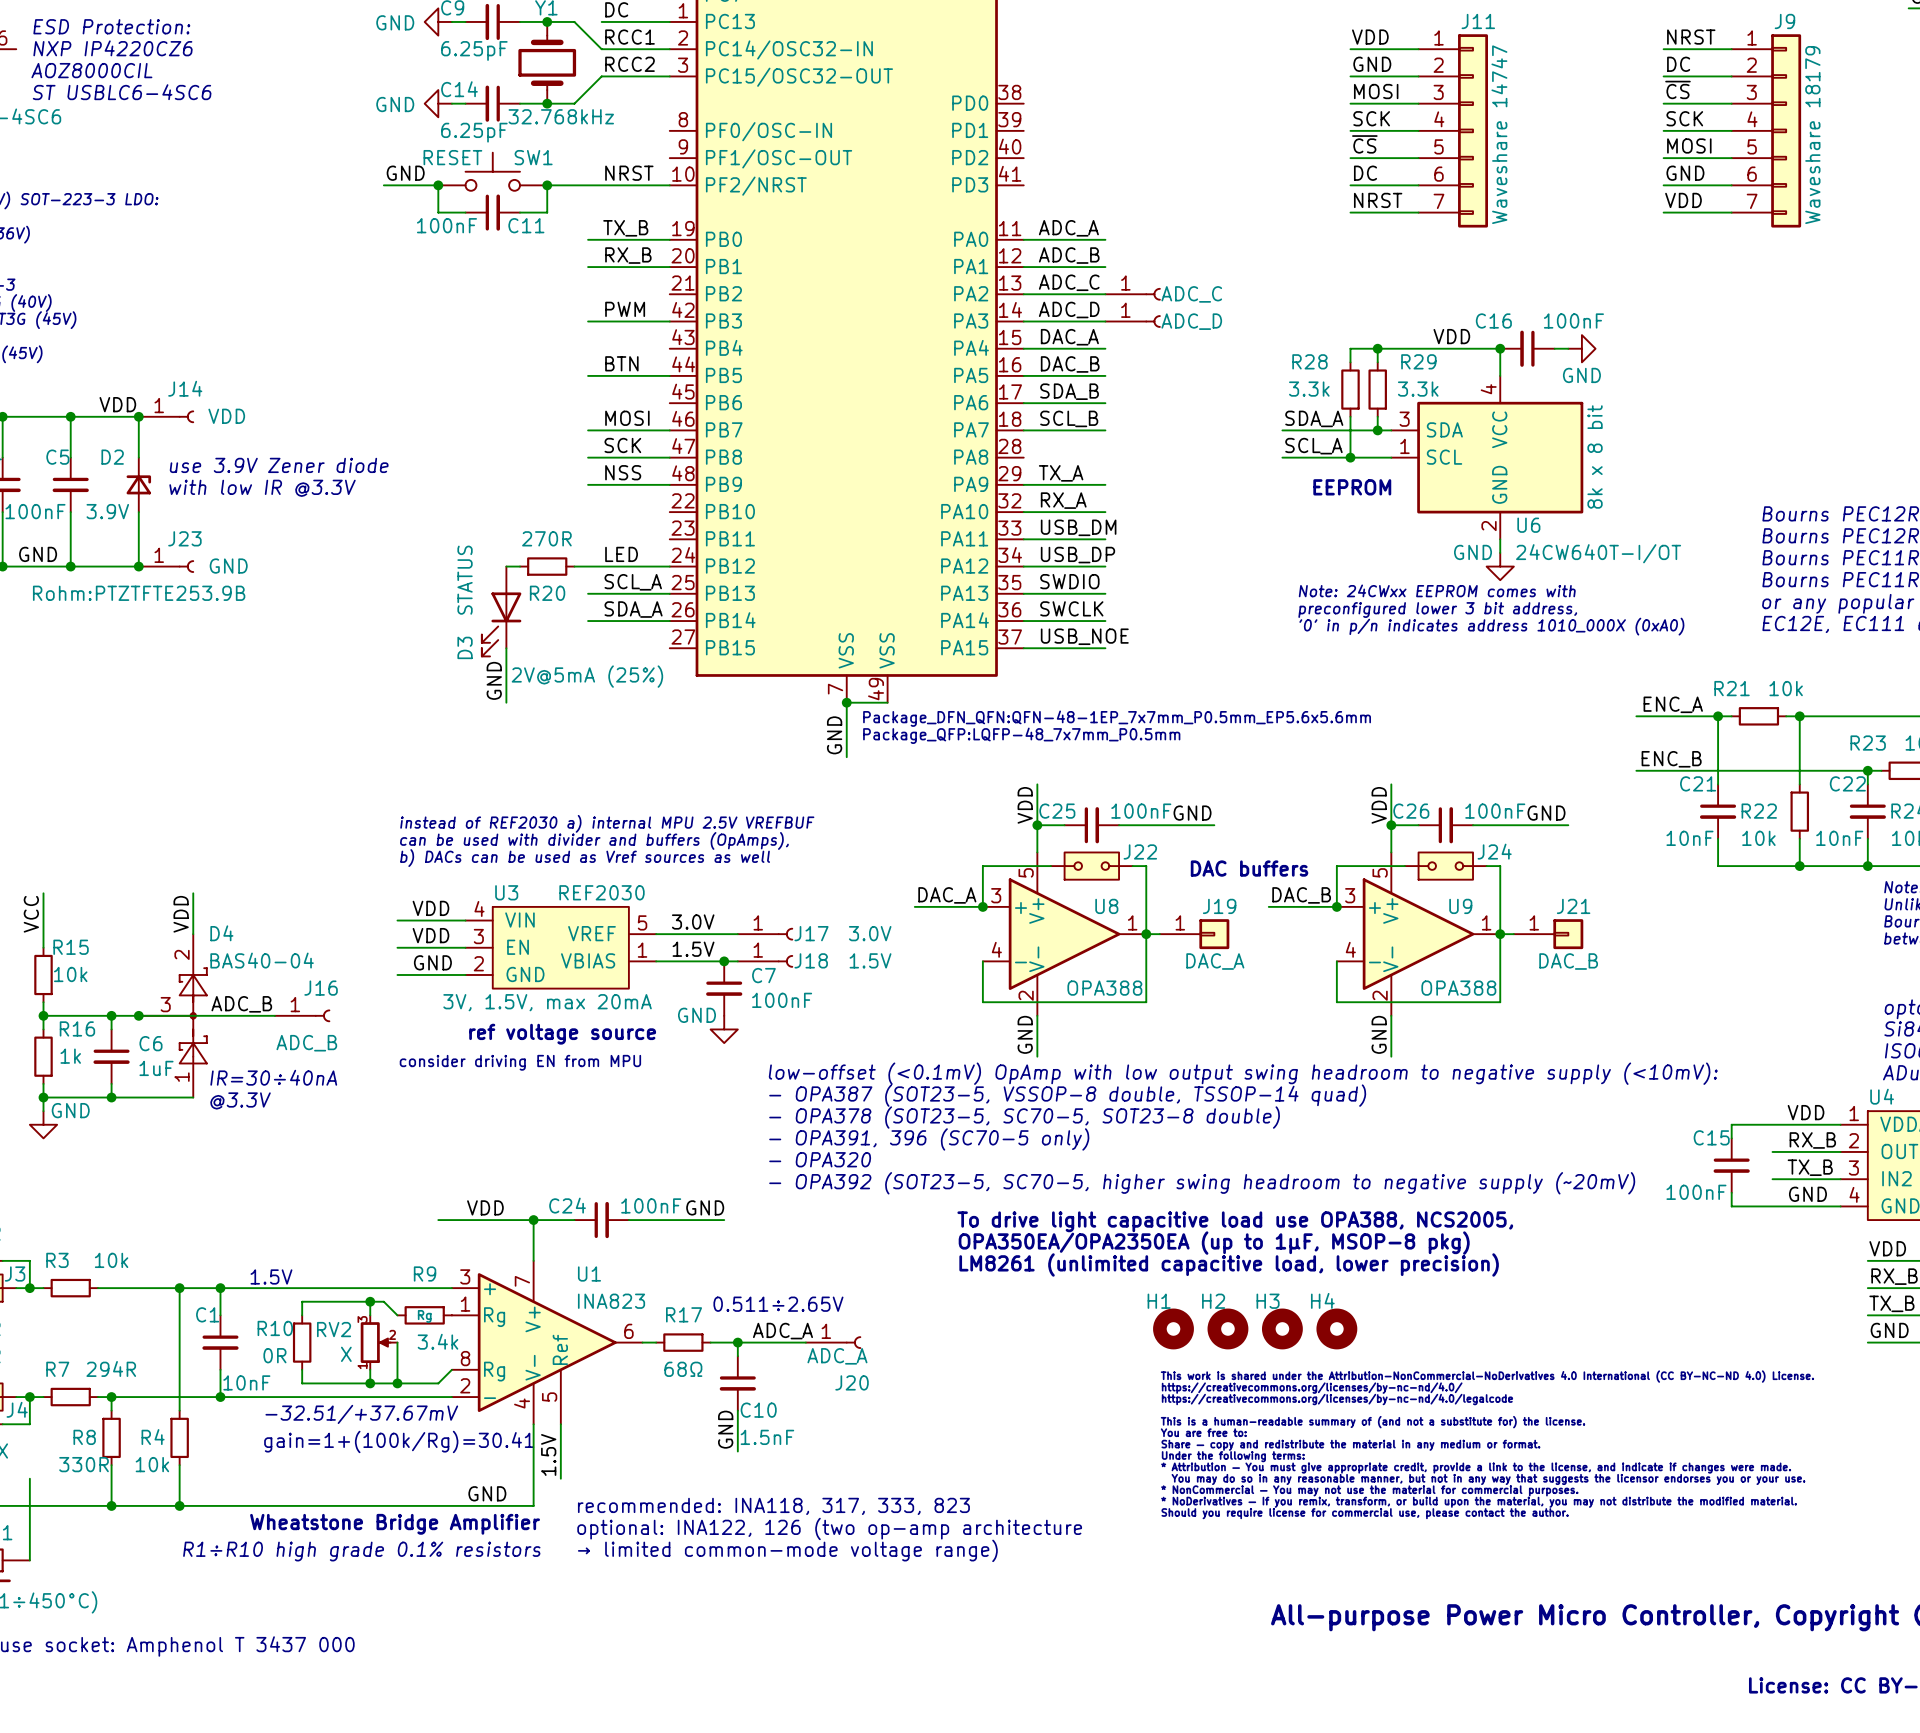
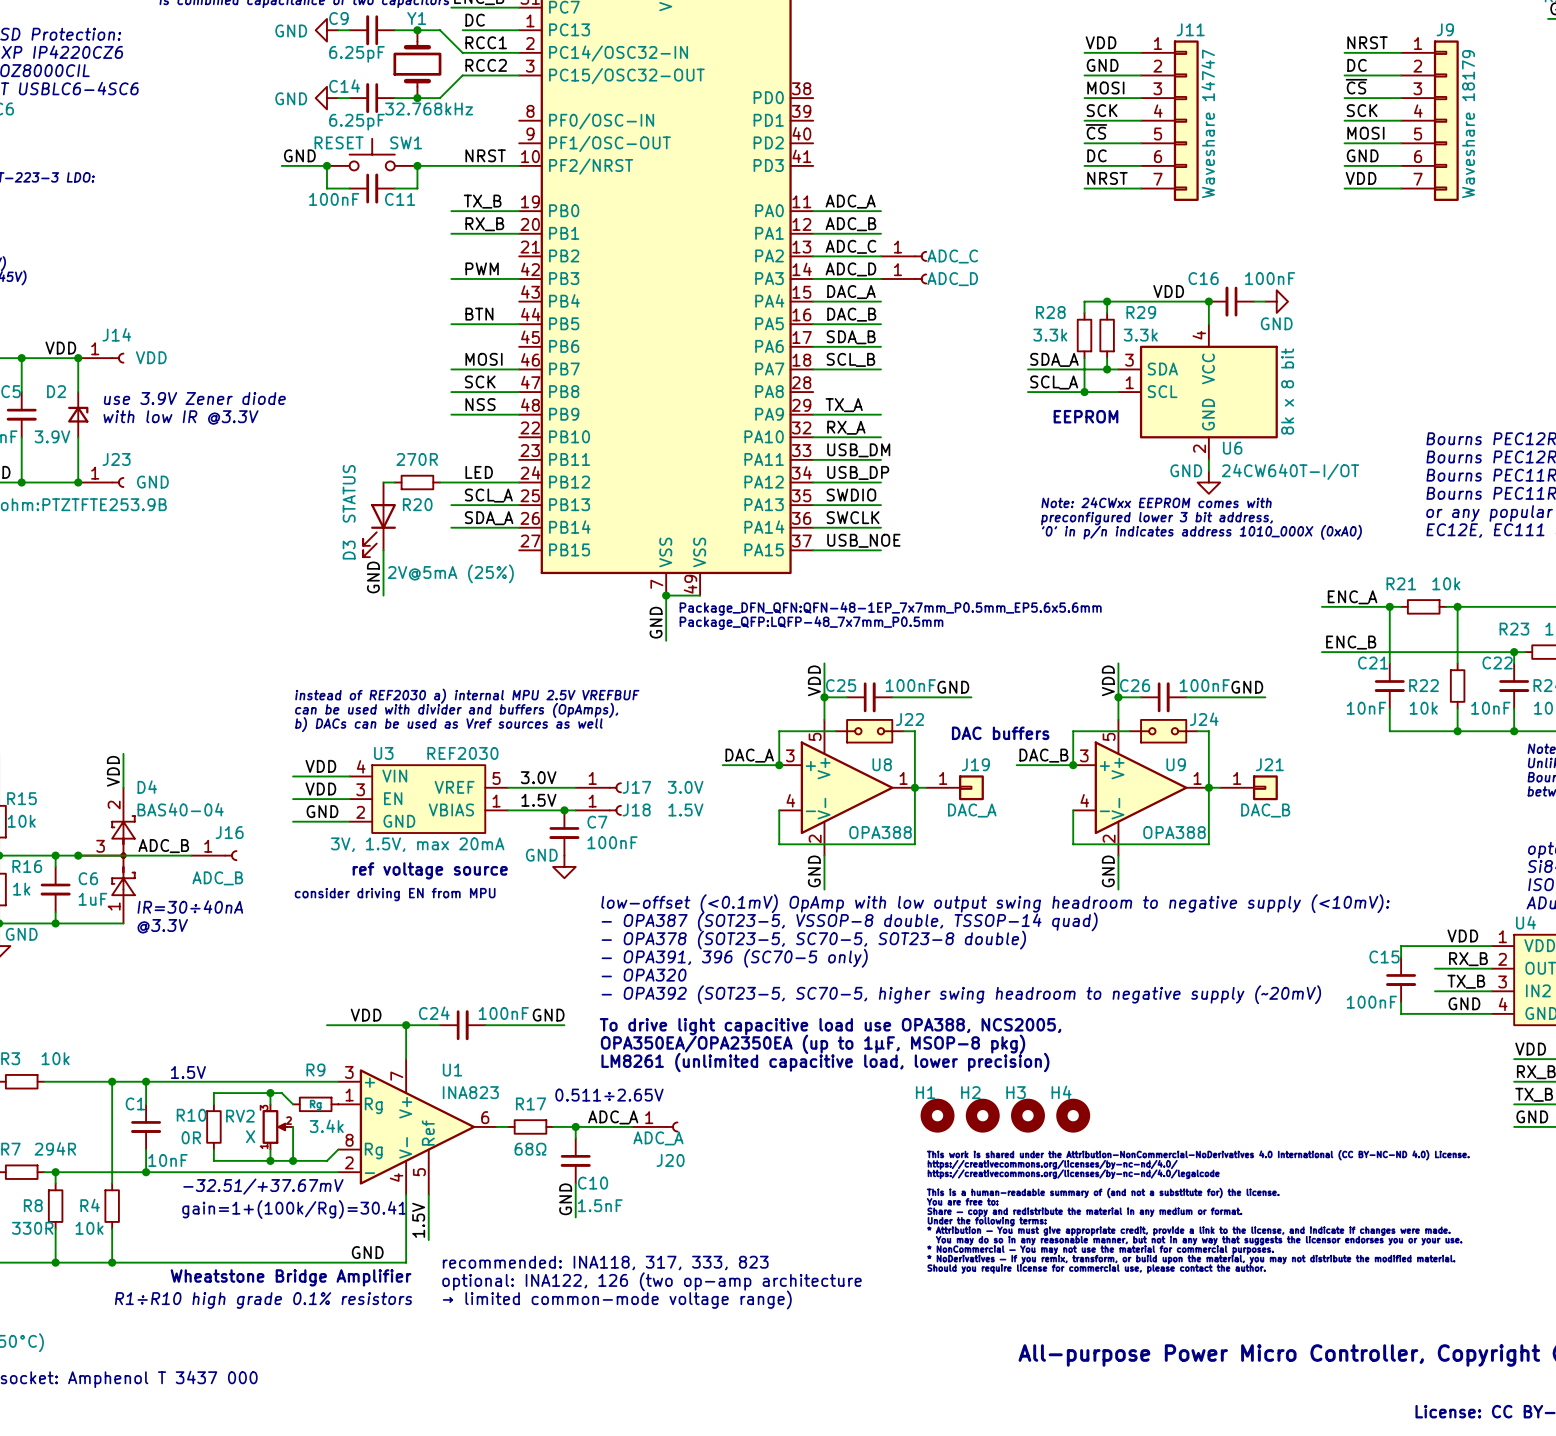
text position: To drive light capacitive load use OPA388, NCS2005, (1235, 1221) -> To drive light capacitive load use OPA388, NCS2005, (830, 1026)
text position: OPA350EA/OPA2350EA (up to 1µF, MSOP-8 pkg) (1214, 1243) -> OPA350EA/OPA2350EA (up to 1µF, MSOP-8 pkg) (813, 1044)
text position: LM8261 (unlimited capacitive load, lower precision) (1229, 1264) -> LM8261 (unlimited capacitive load, lower precision) (825, 1062)

